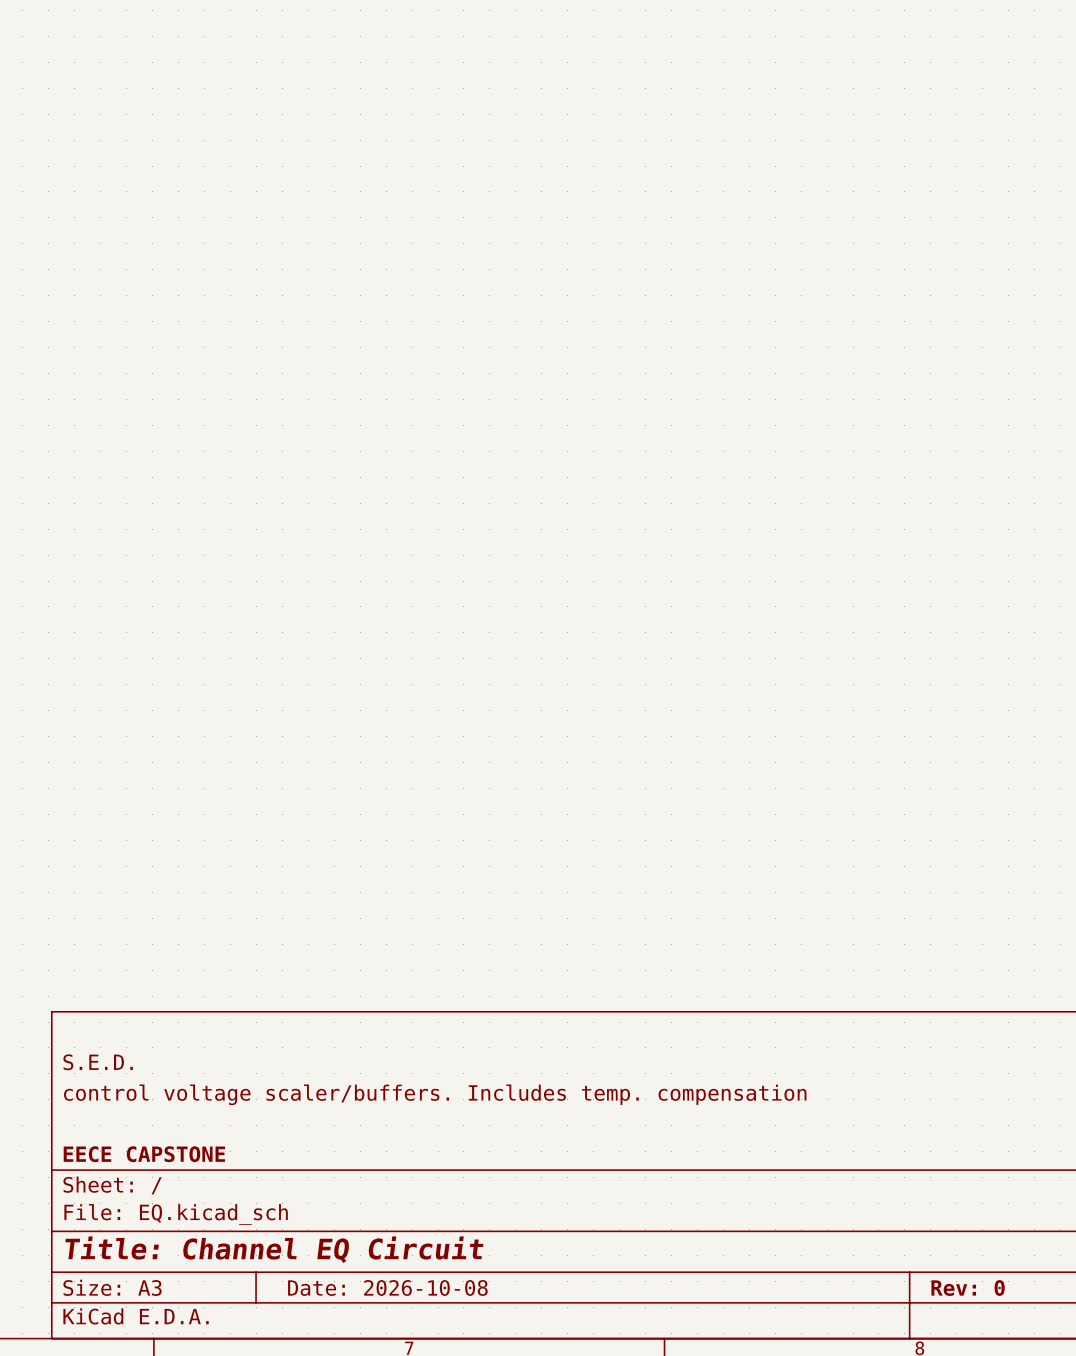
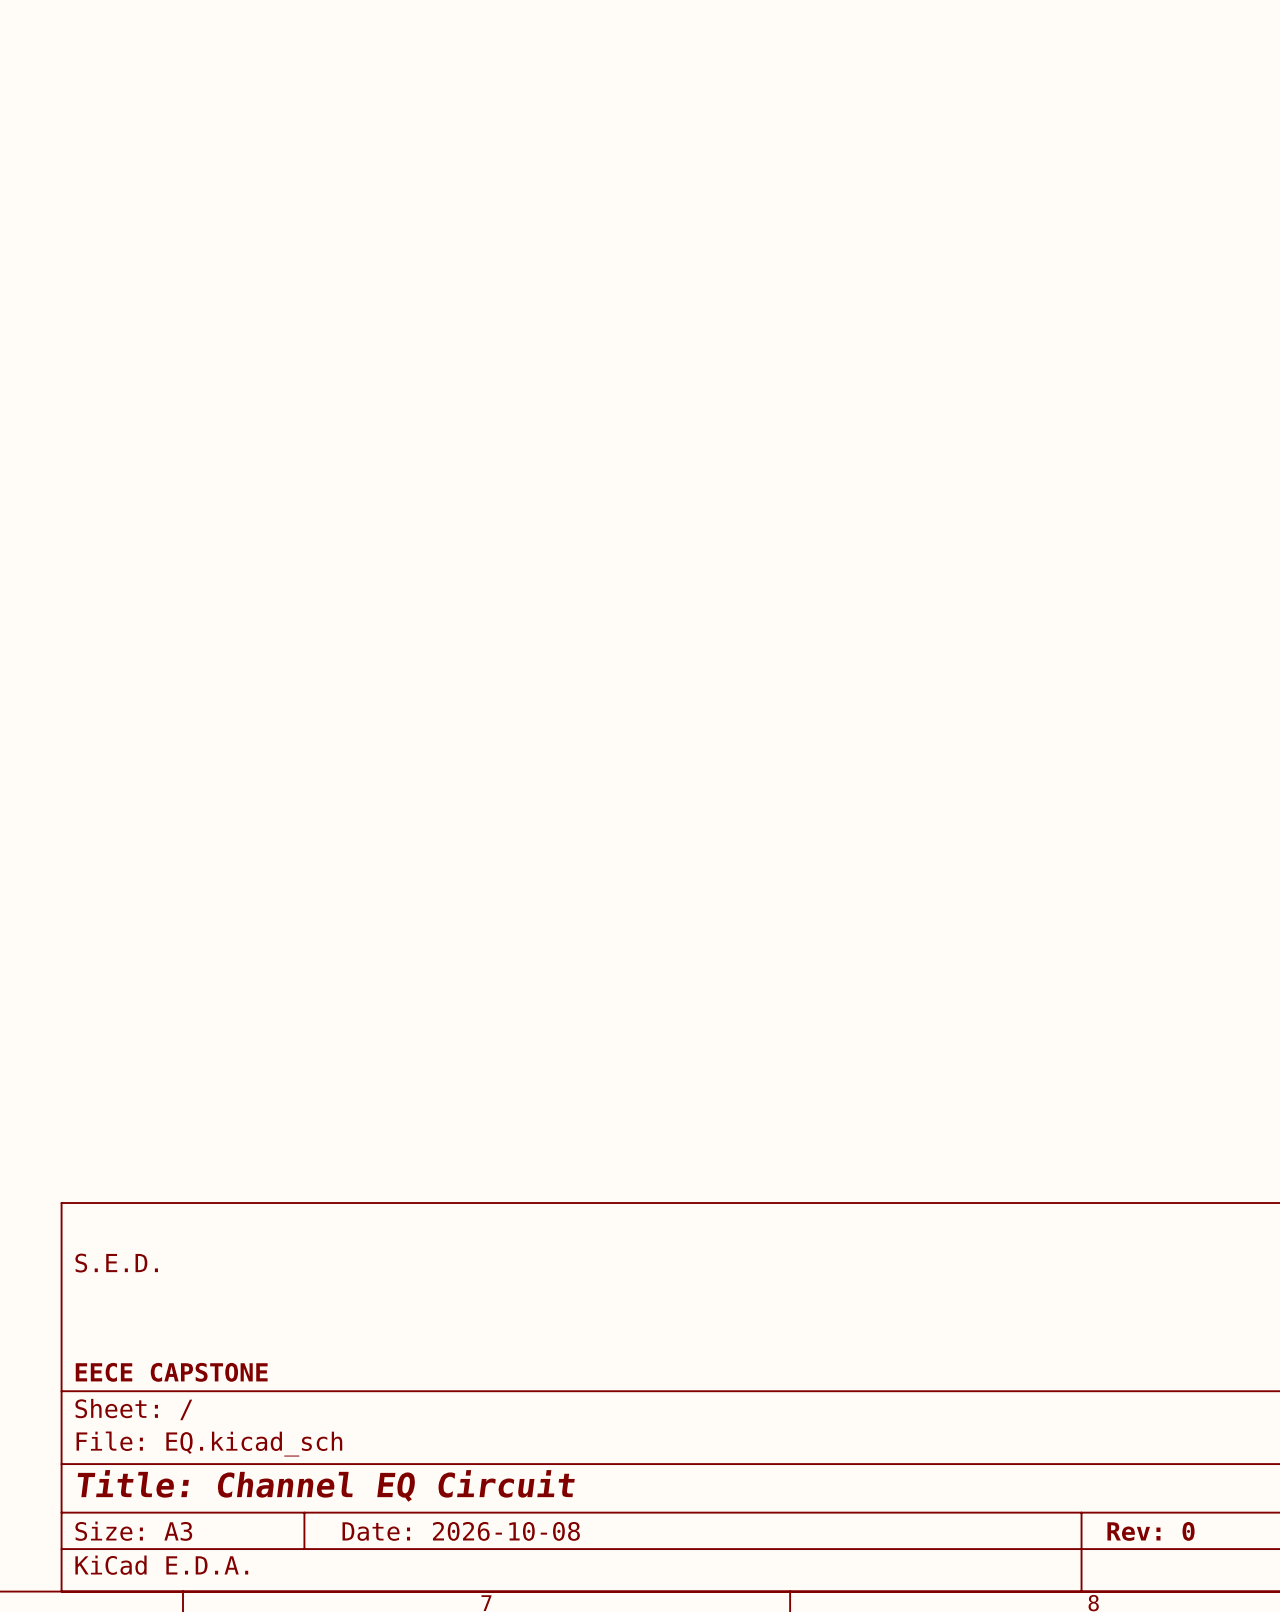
title block: control voltage scaler/buffers. Includes temp. compensation (435, 1094) -> none

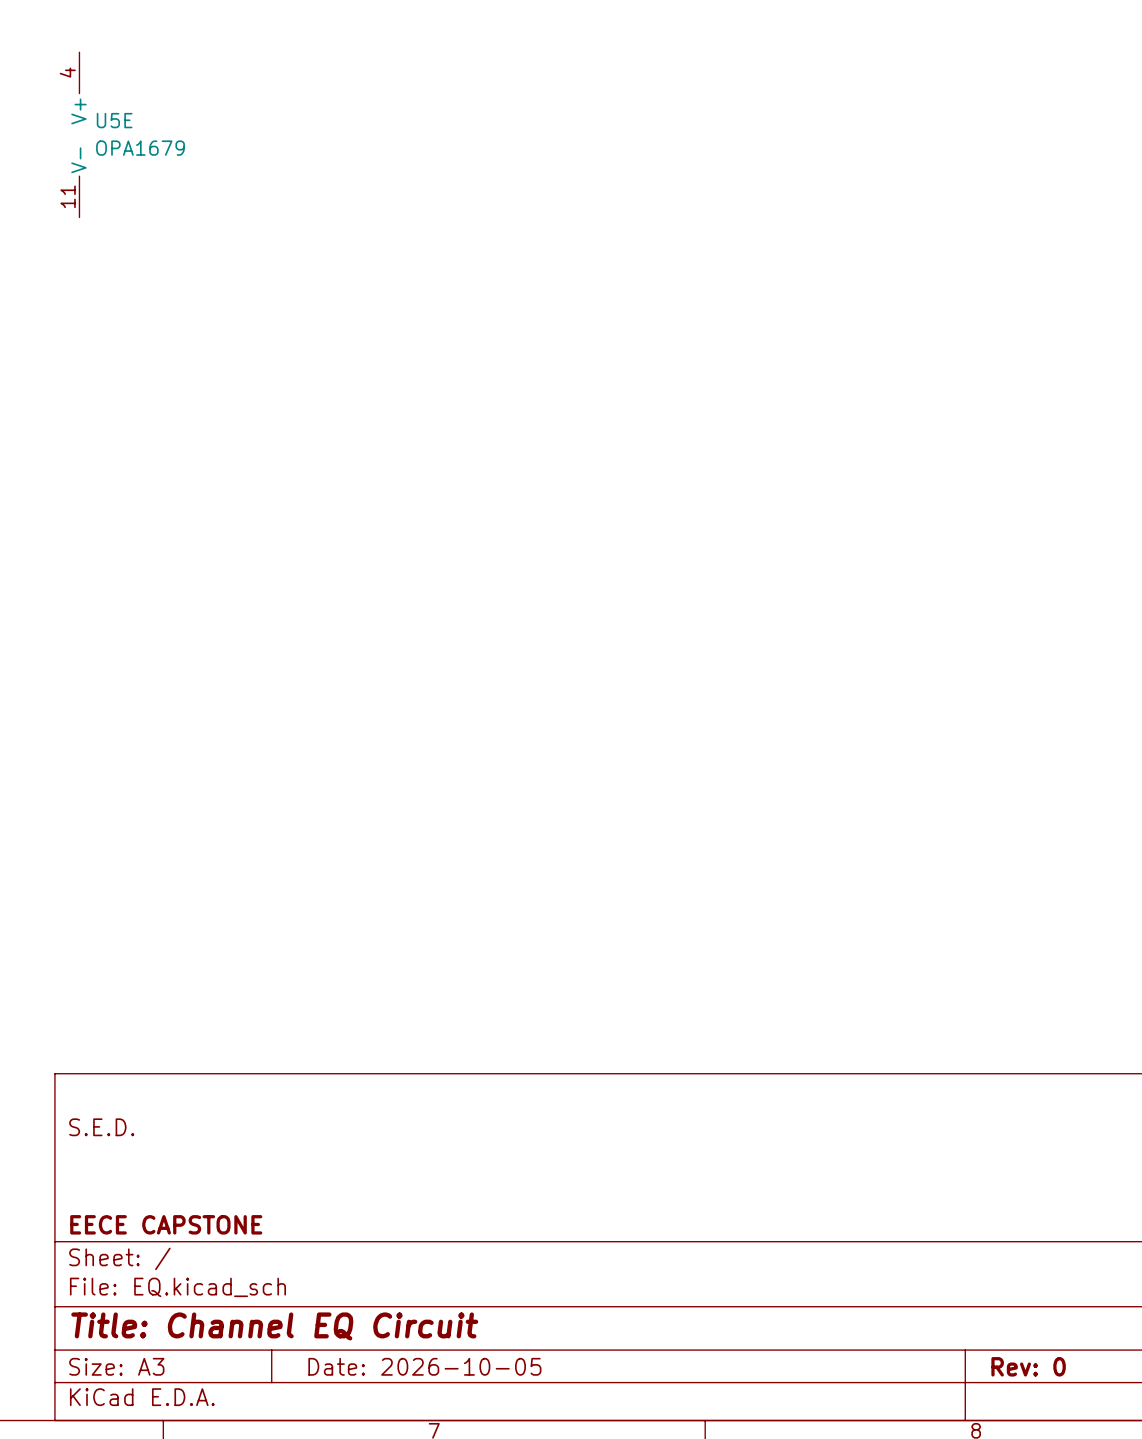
U5E: none -> OPA1679 (79, 134)
title block: Date: 2026-10-08 (461, 1531) -> Date: 2026-10-05 (424, 1366)

